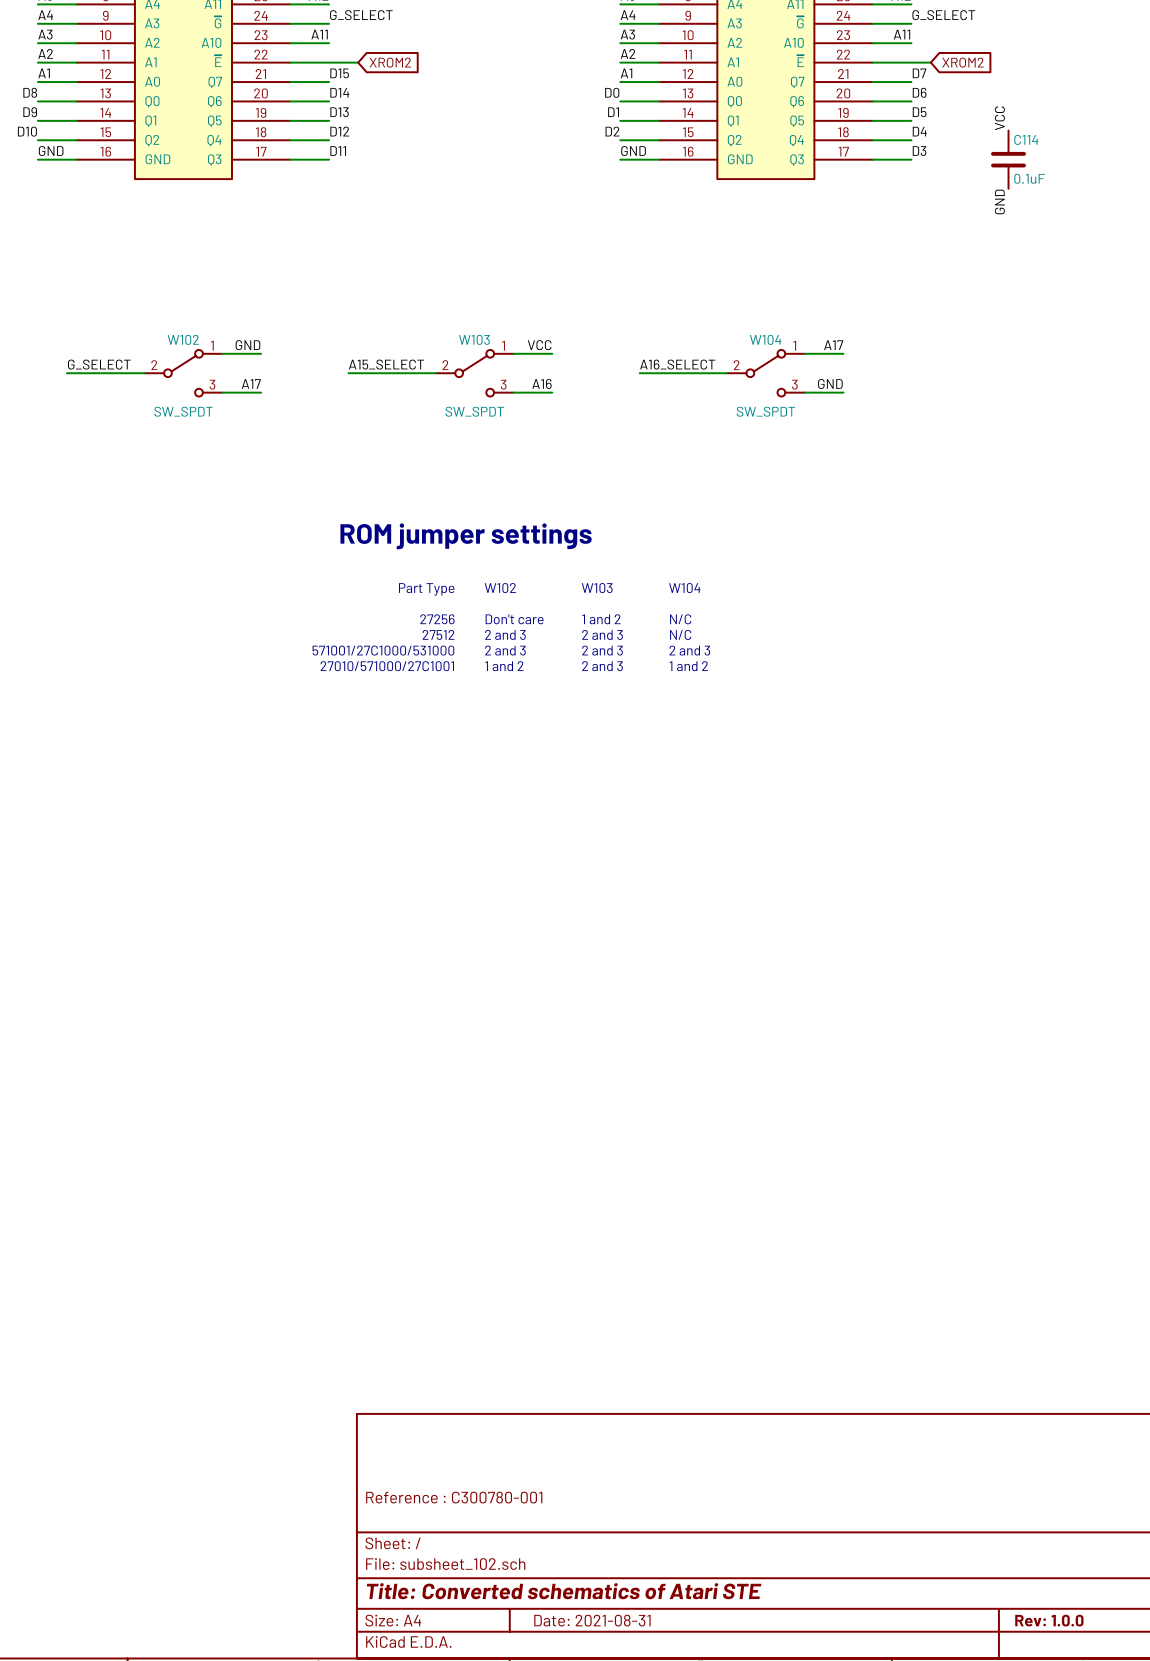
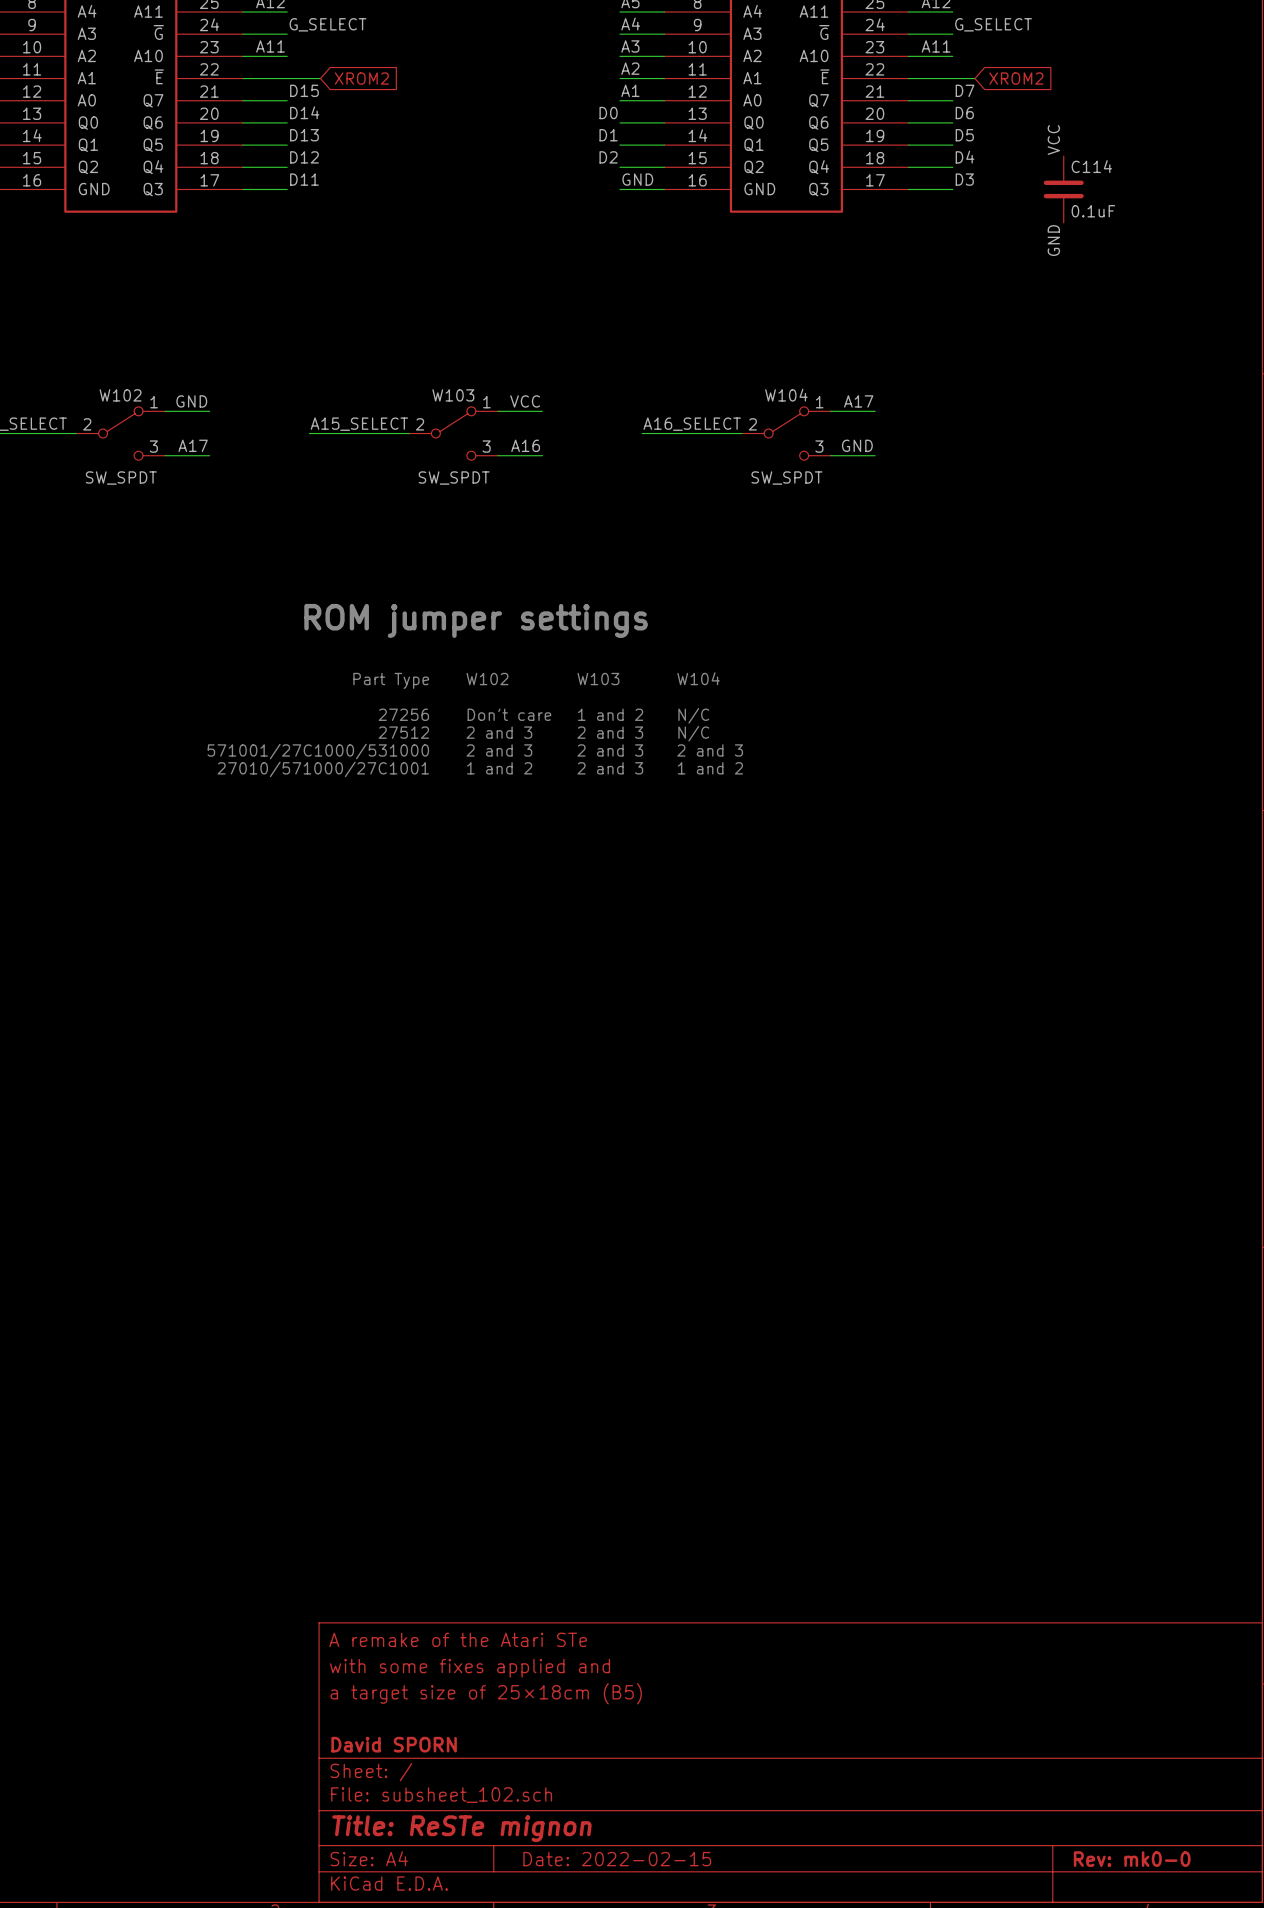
title block: none -> A remake of the Atari STe (458, 1639)
title block: none -> with some fixes applied and (470, 1668)
title block: none -> a target size of 25×18cm (B5) (486, 1693)
title block: Reference : C300780-001 (454, 1497) -> none
title block: none -> David SPORN (394, 1744)
title block: Title: Converted schematics of Atari STE (564, 1591) -> Title: ReSTe mignon (461, 1828)
title block: Date: 2021-08-31 (592, 1620) -> Date: 2022-02-15 (617, 1859)
title block: Rev: 1.0.0 (1049, 1620) -> Rev: mk0-0 (1132, 1859)

